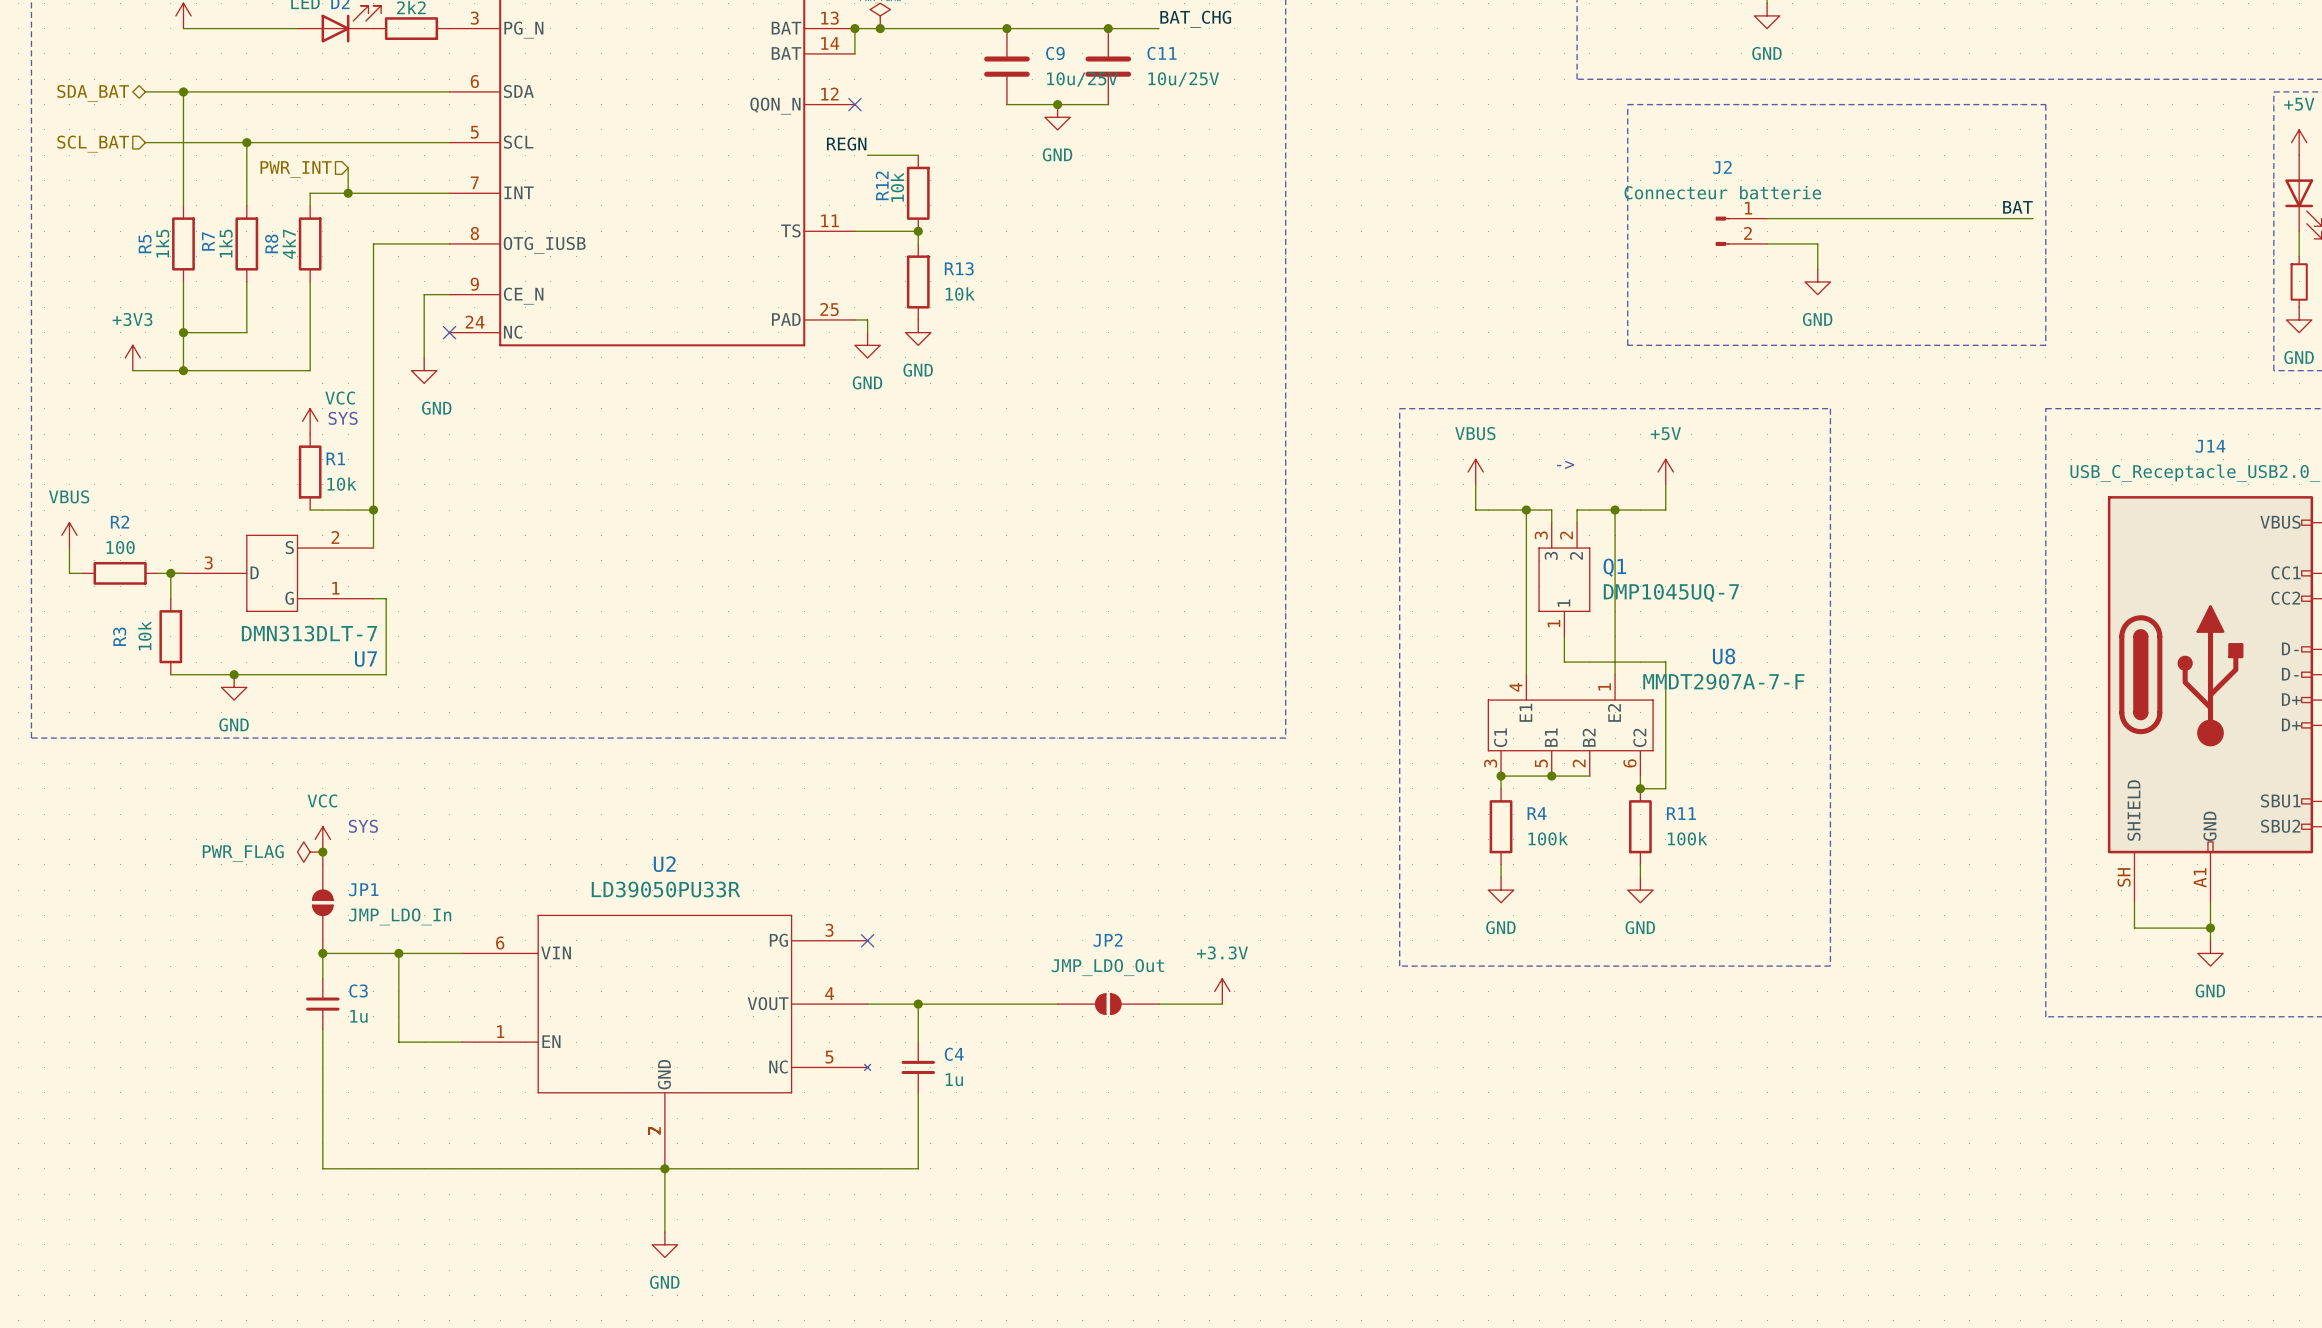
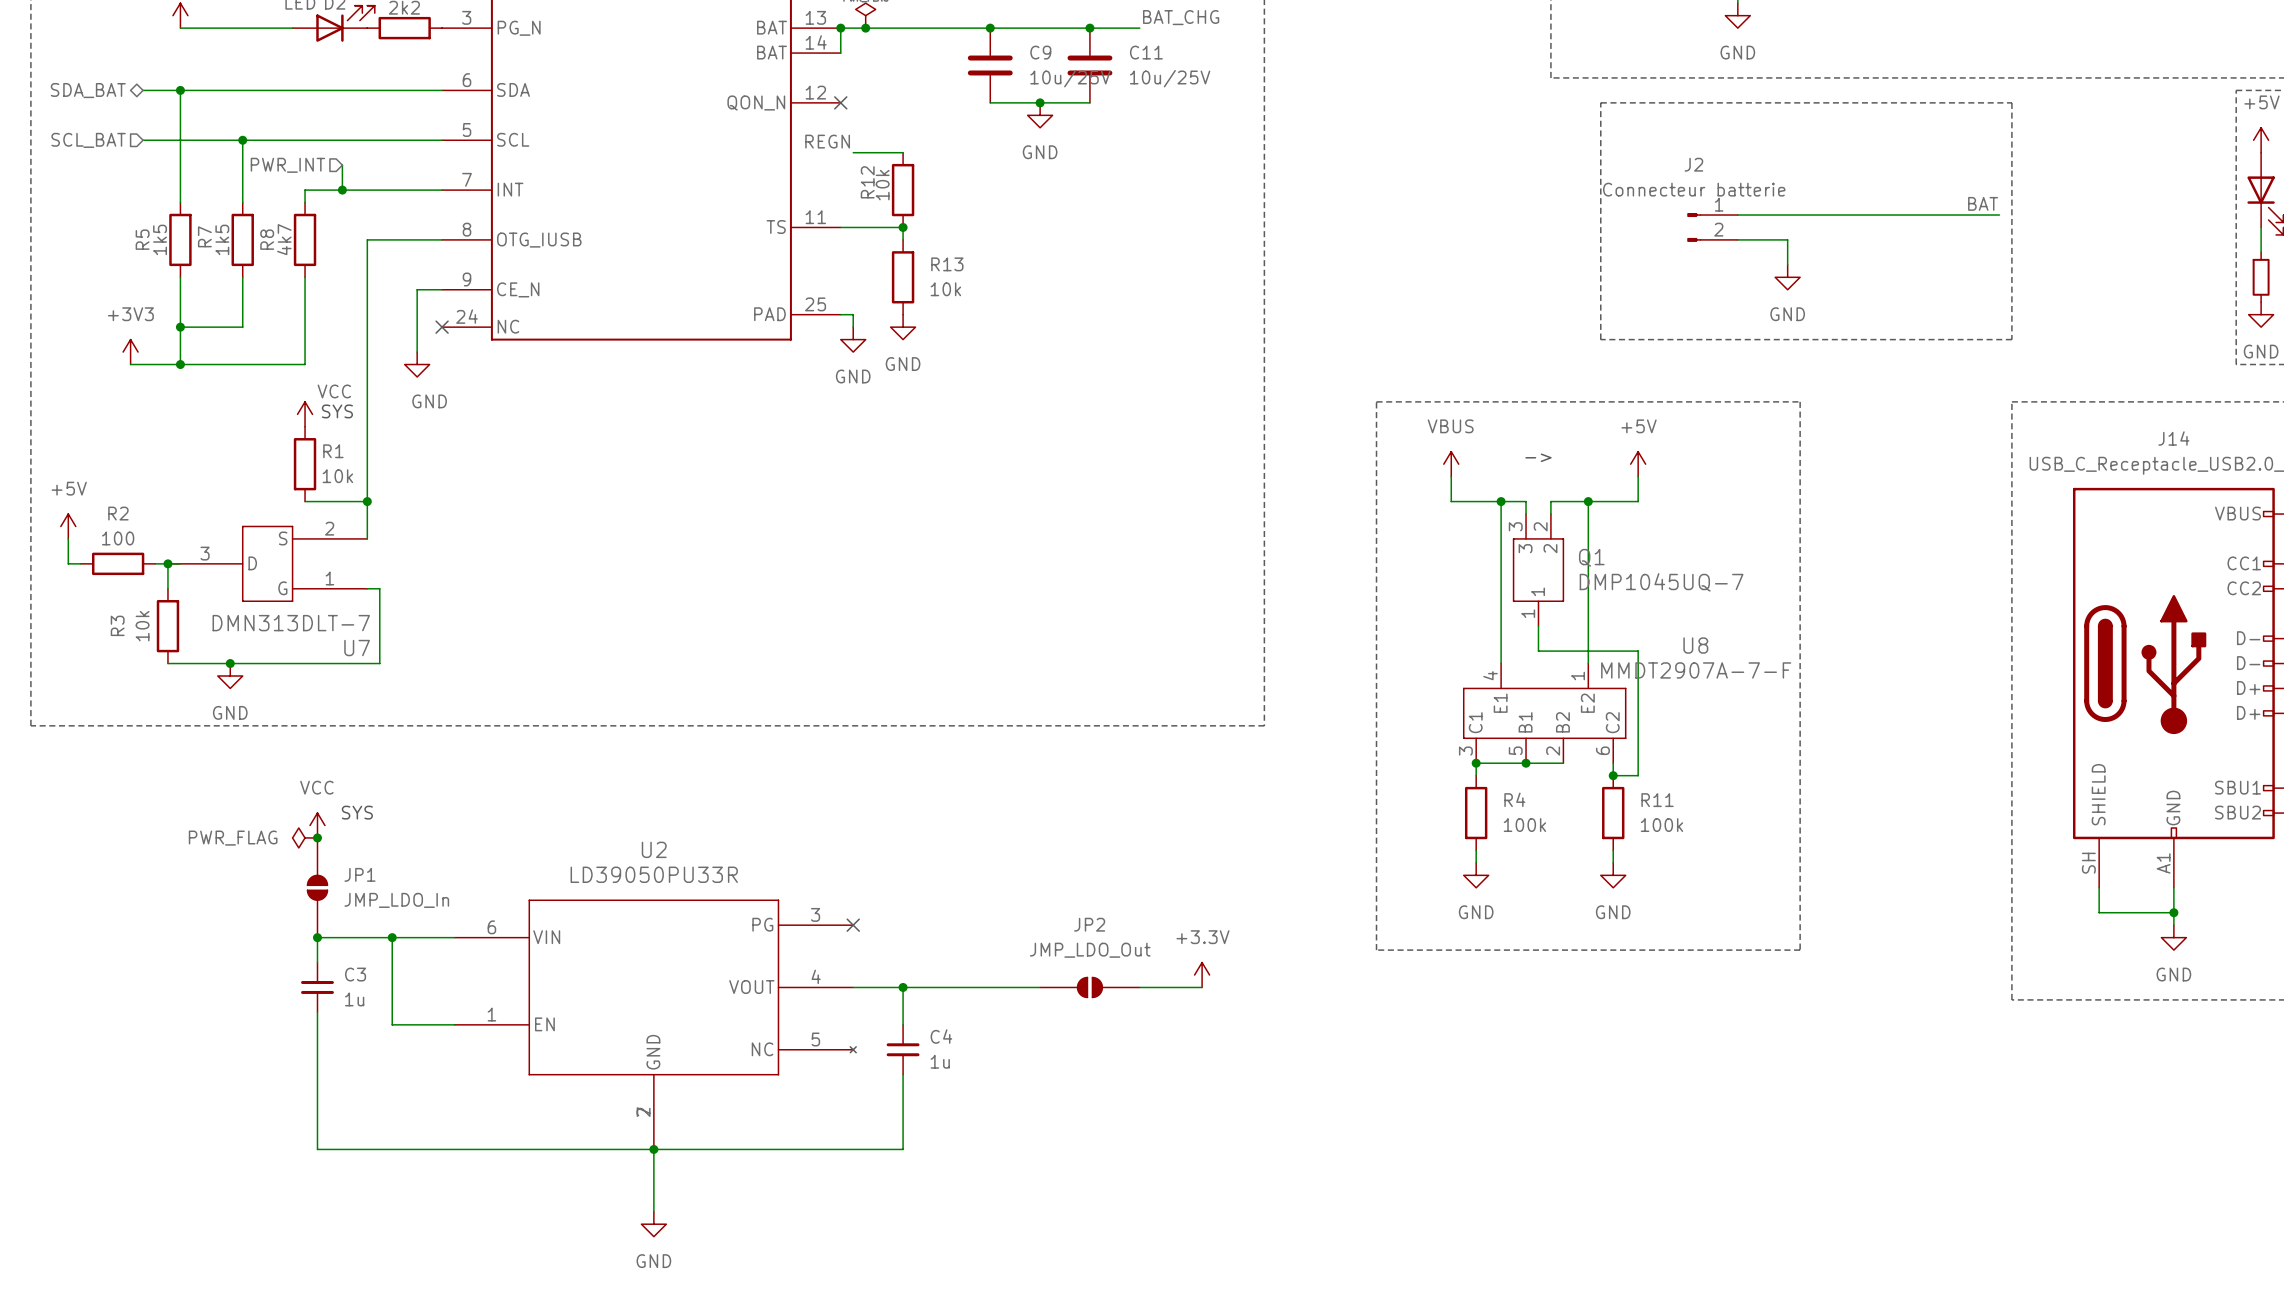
power symbol: VBUS (69, 535) -> +5V (68, 526)

